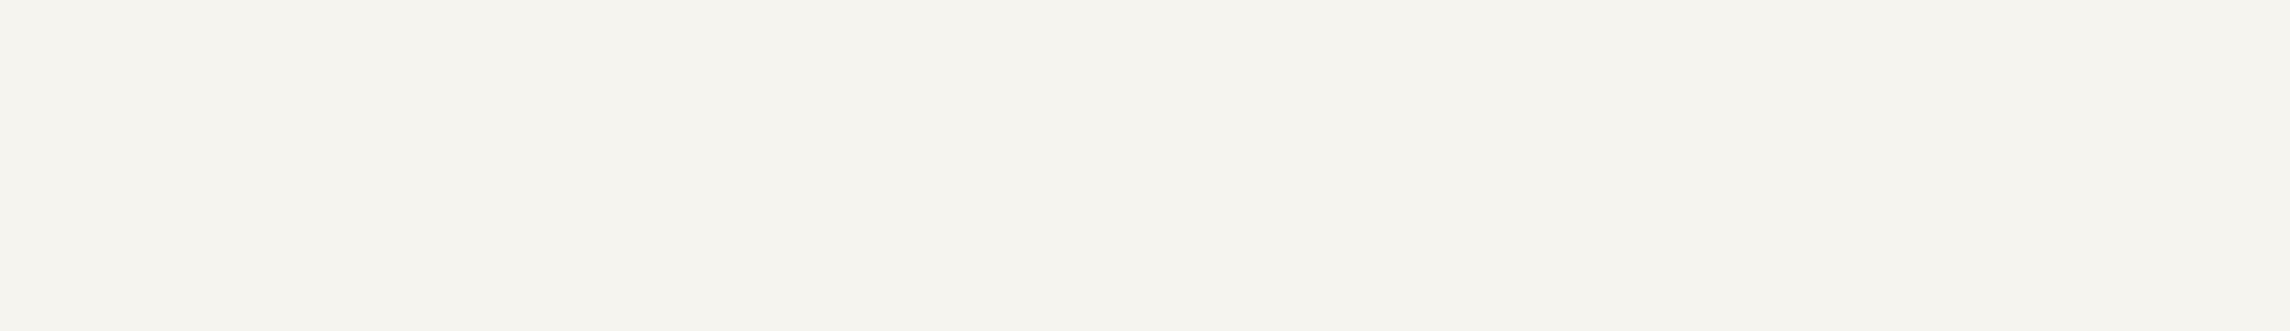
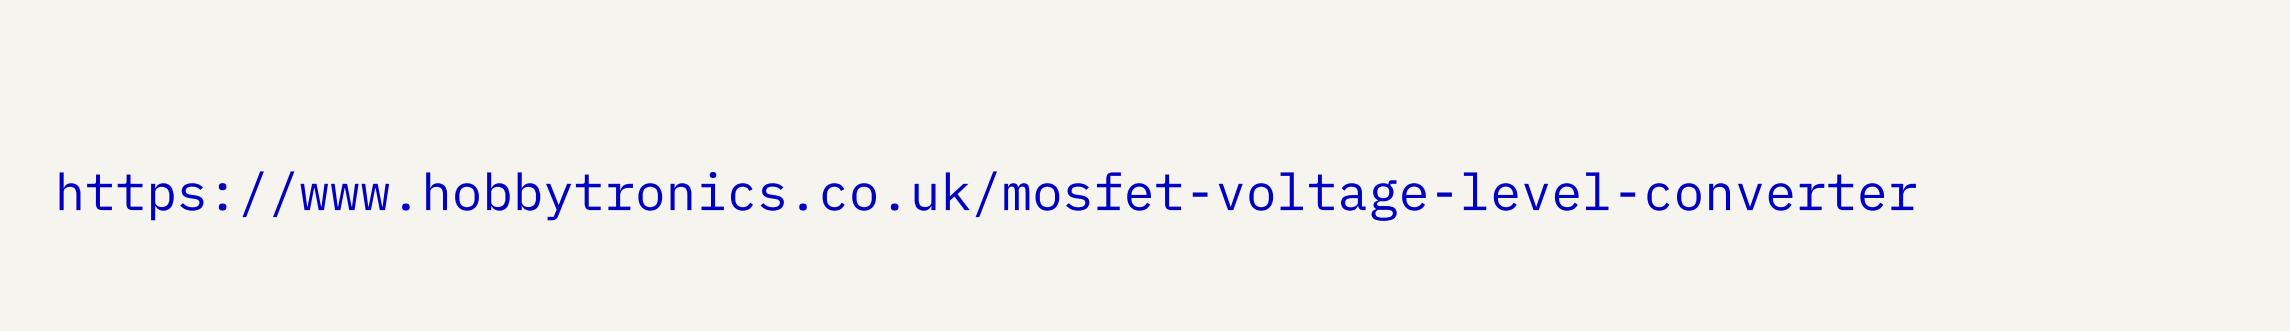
text: none -> https://www.hobbytronics.co.uk/mosfet-voltage-level-converter (987, 196)

